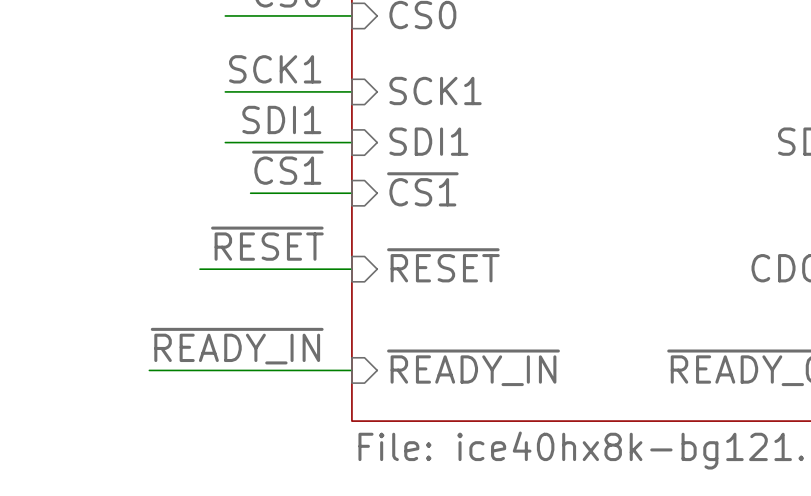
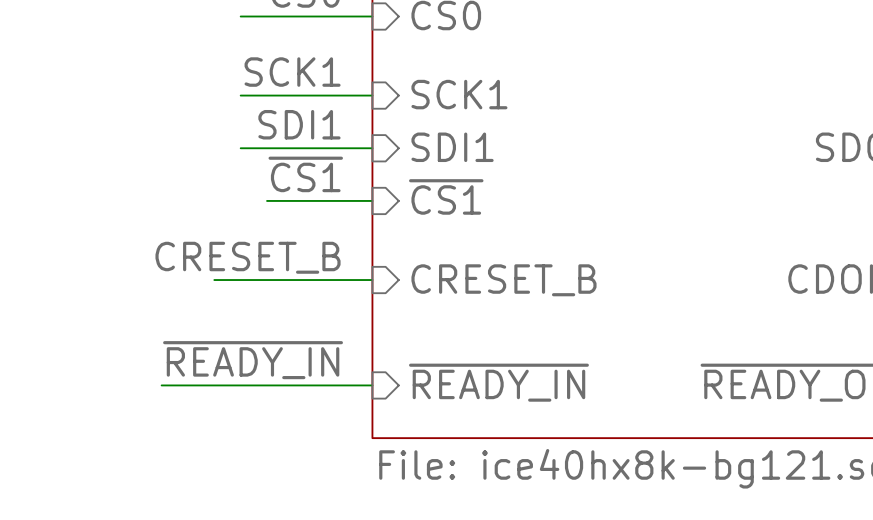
label: ~{RESET} (267, 243) -> CRESET_B (248, 257)
sheet pin: ~{RESET} (443, 265) -> CRESET_B (503, 280)

